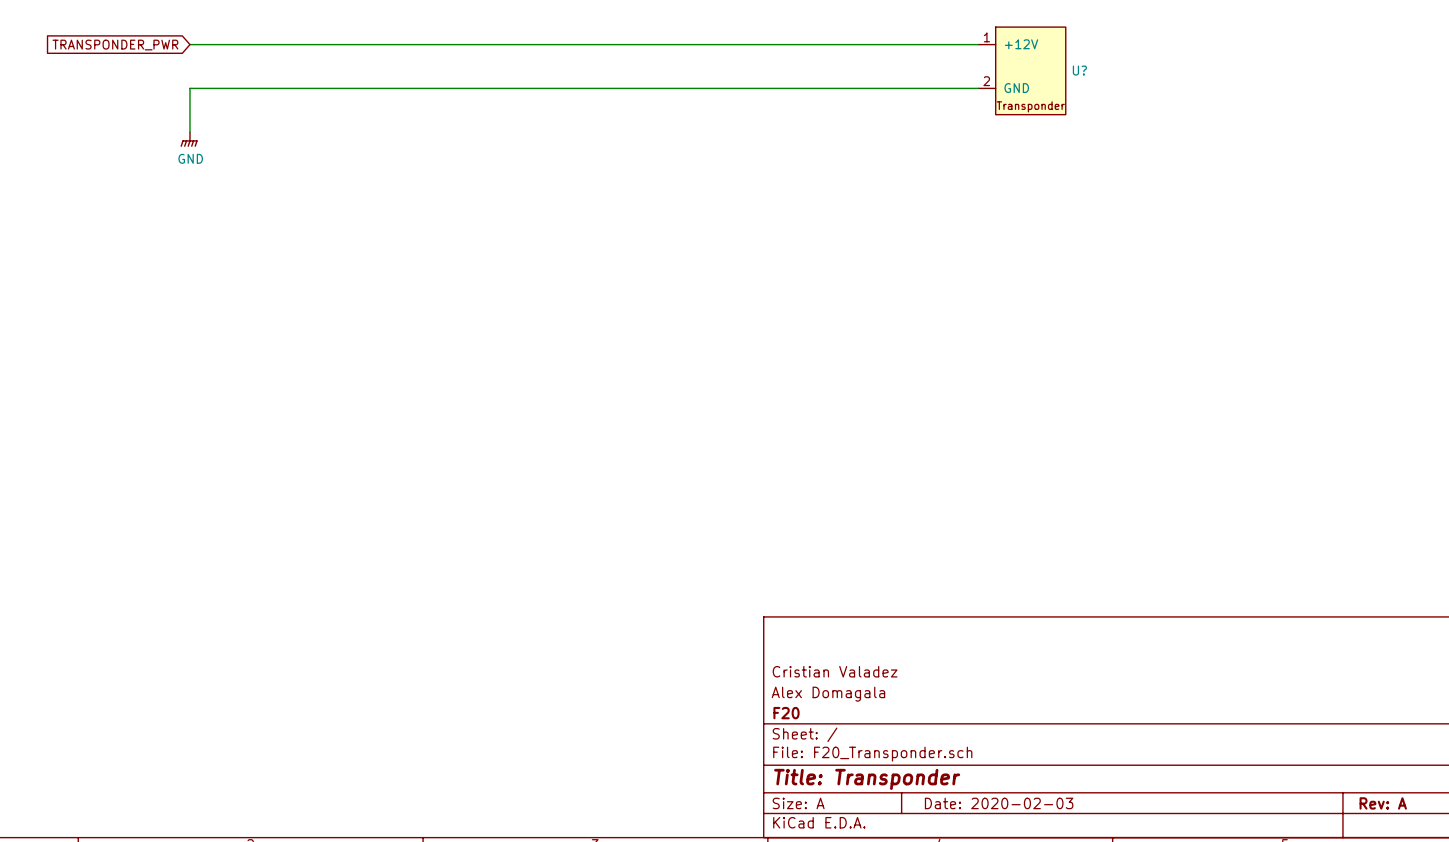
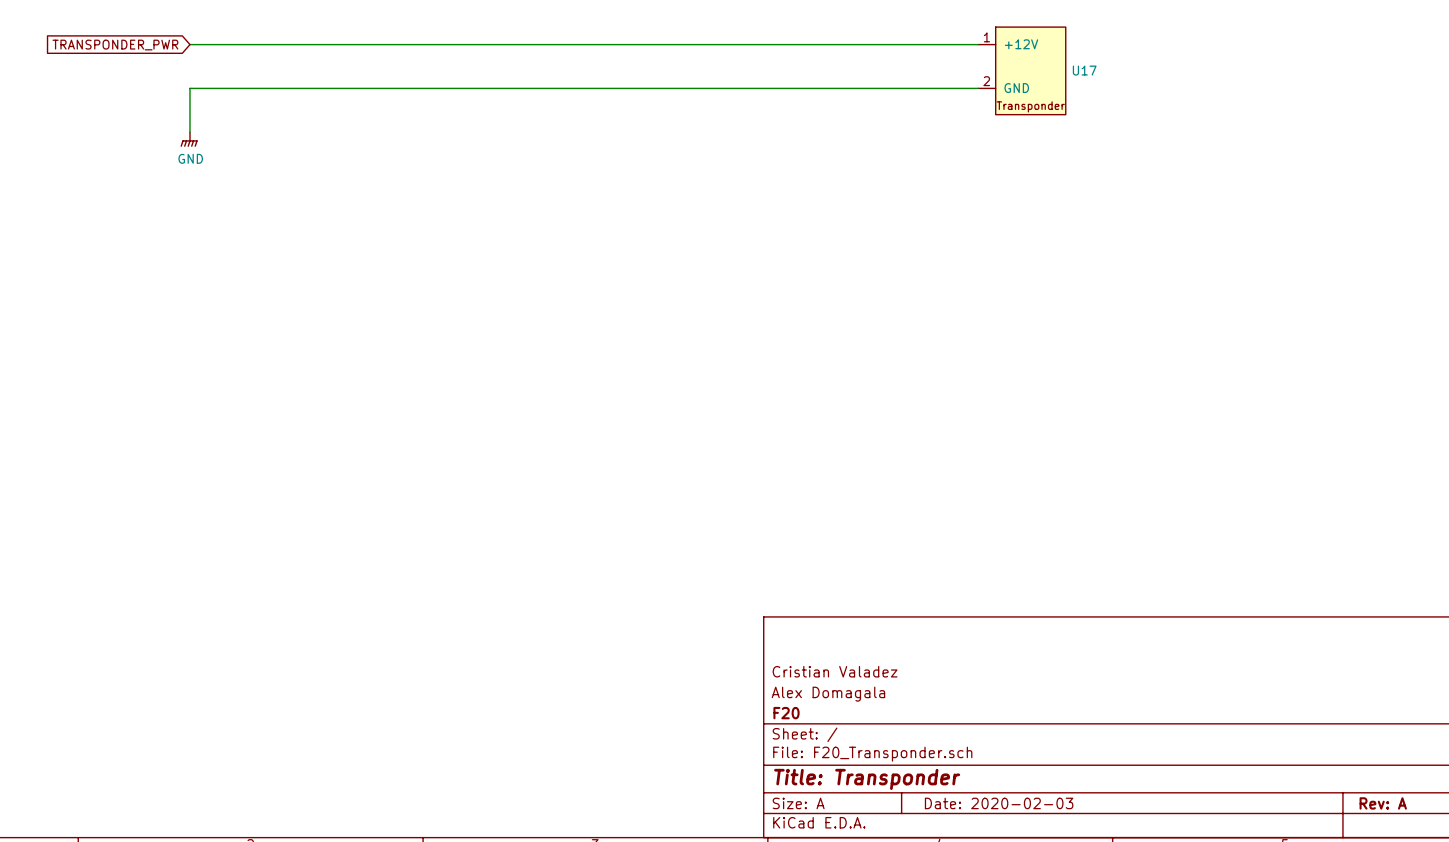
U? name: U? (1079, 70) -> U17 (1084, 70)

